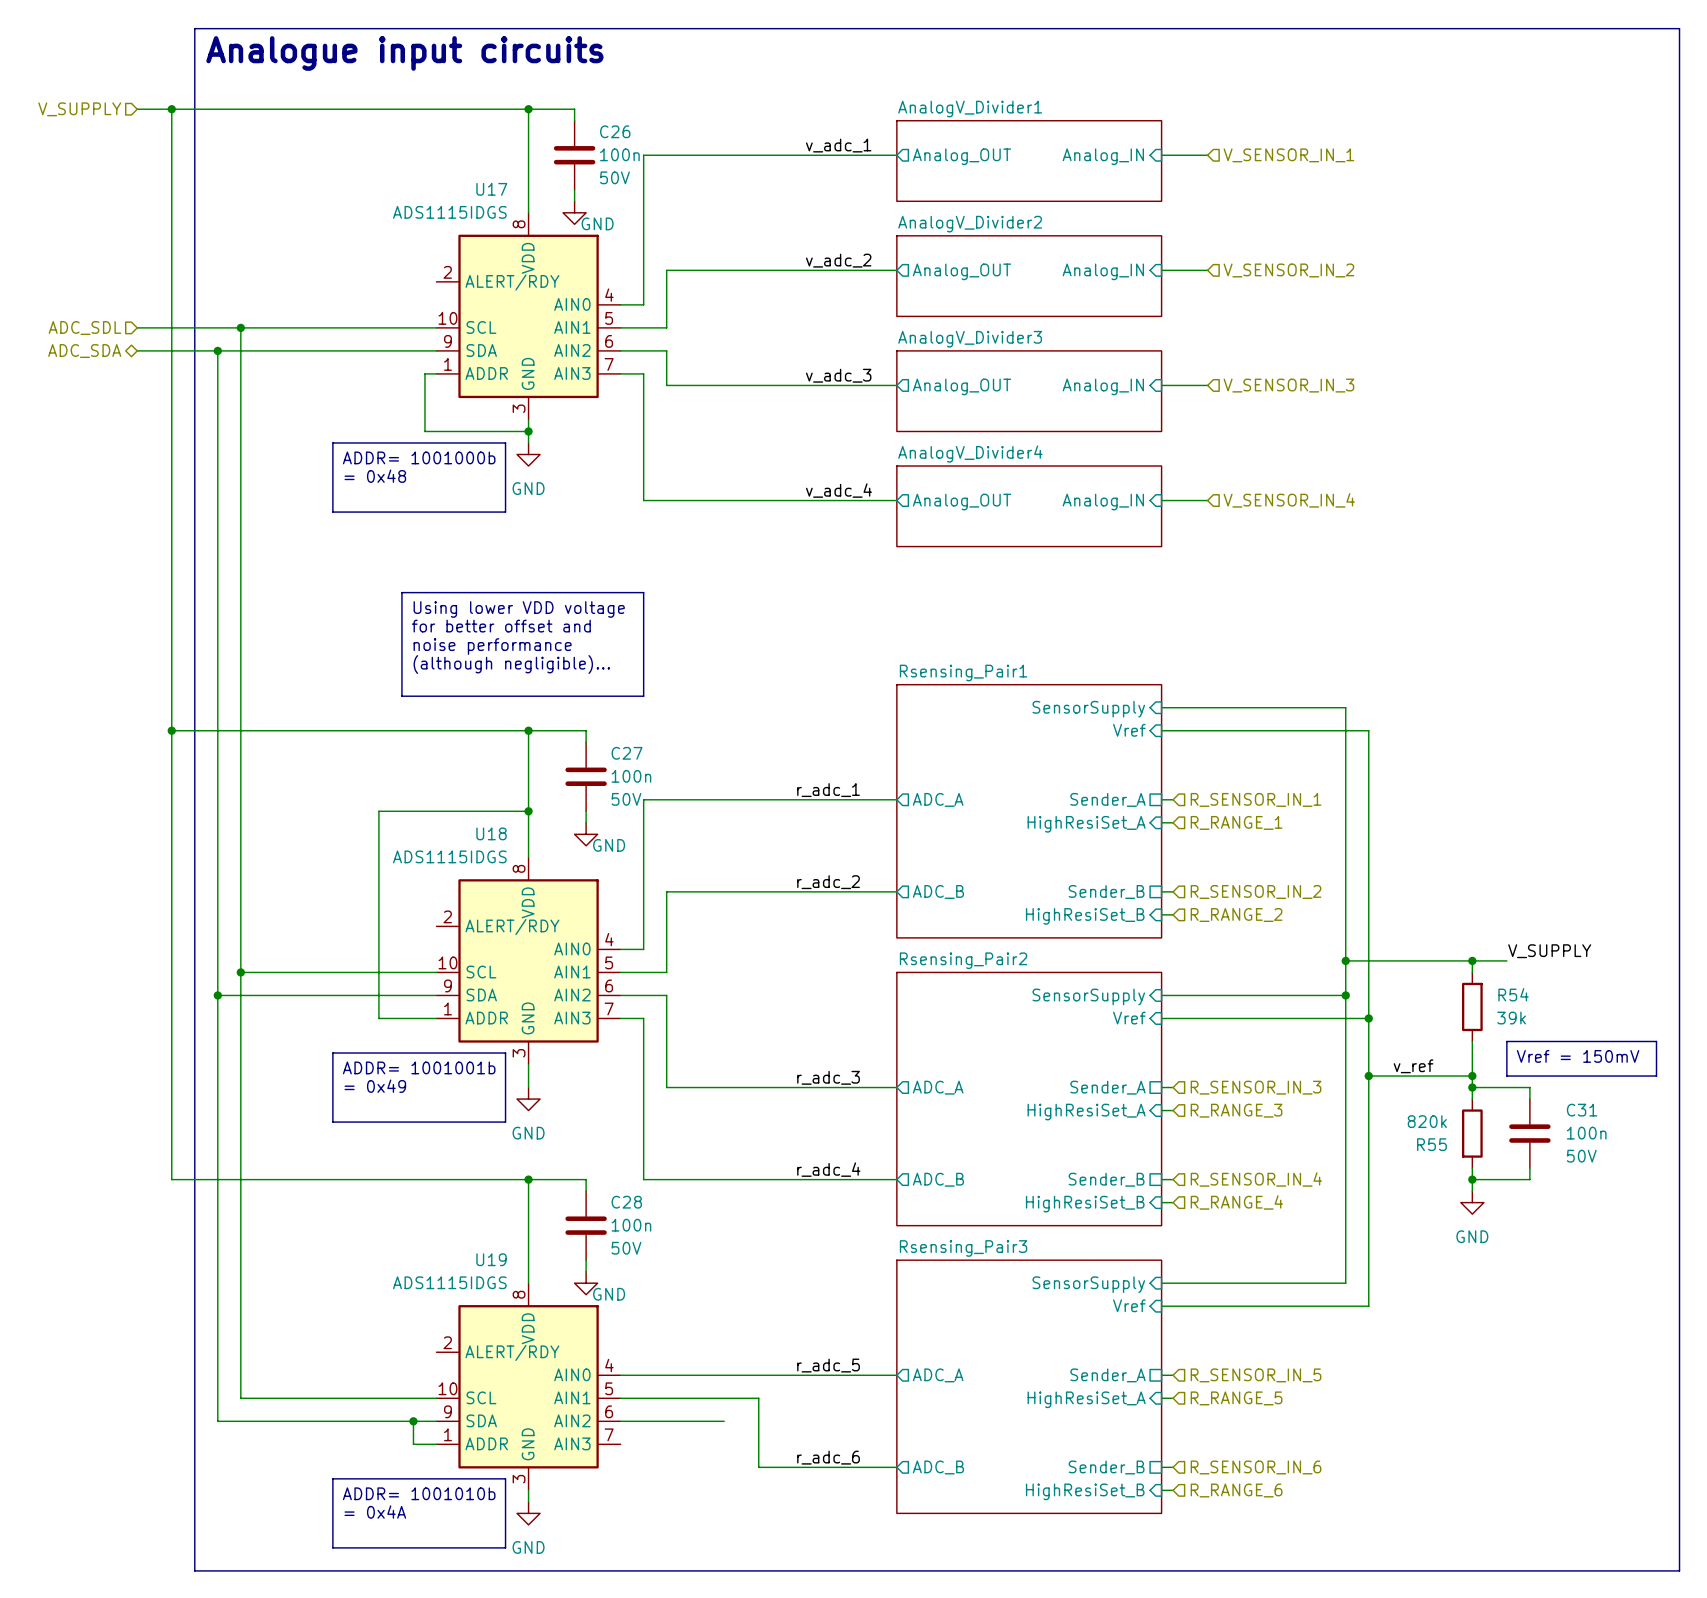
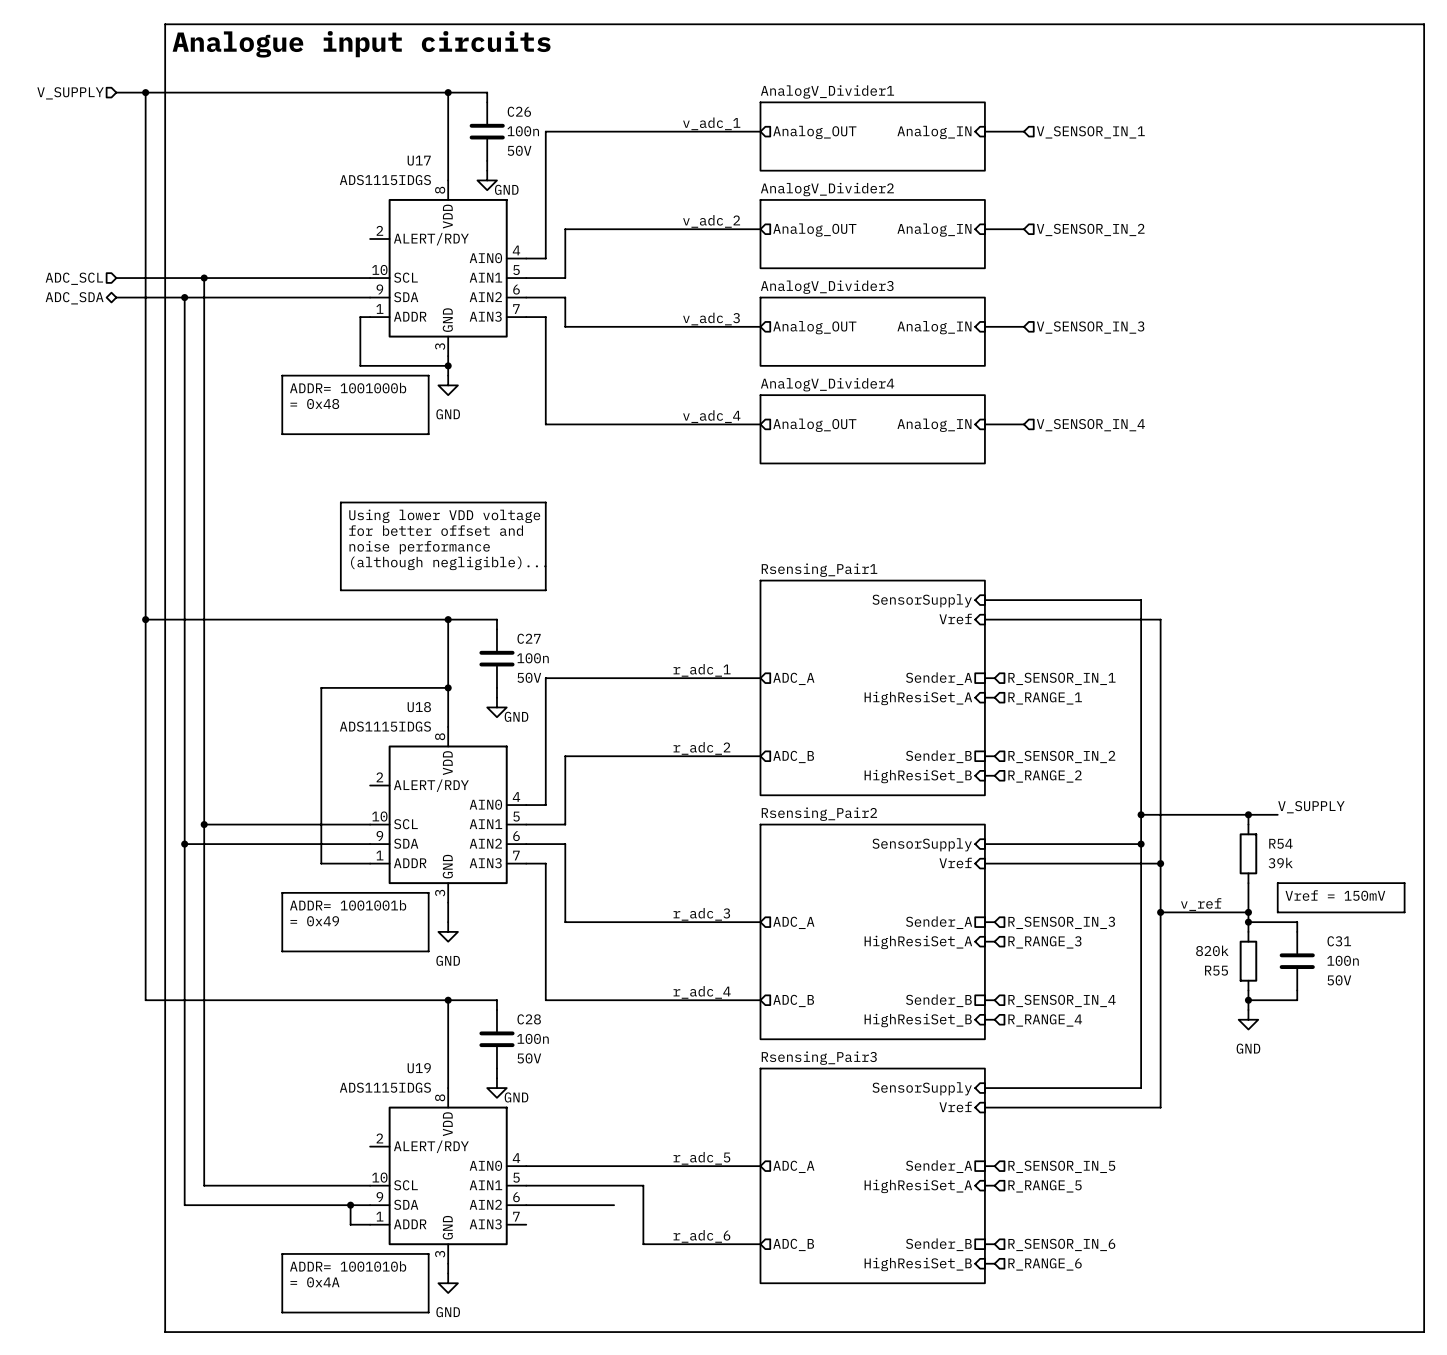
hierarchical label: ADC_SDL (84, 328) -> ADC_SCL (74, 278)

